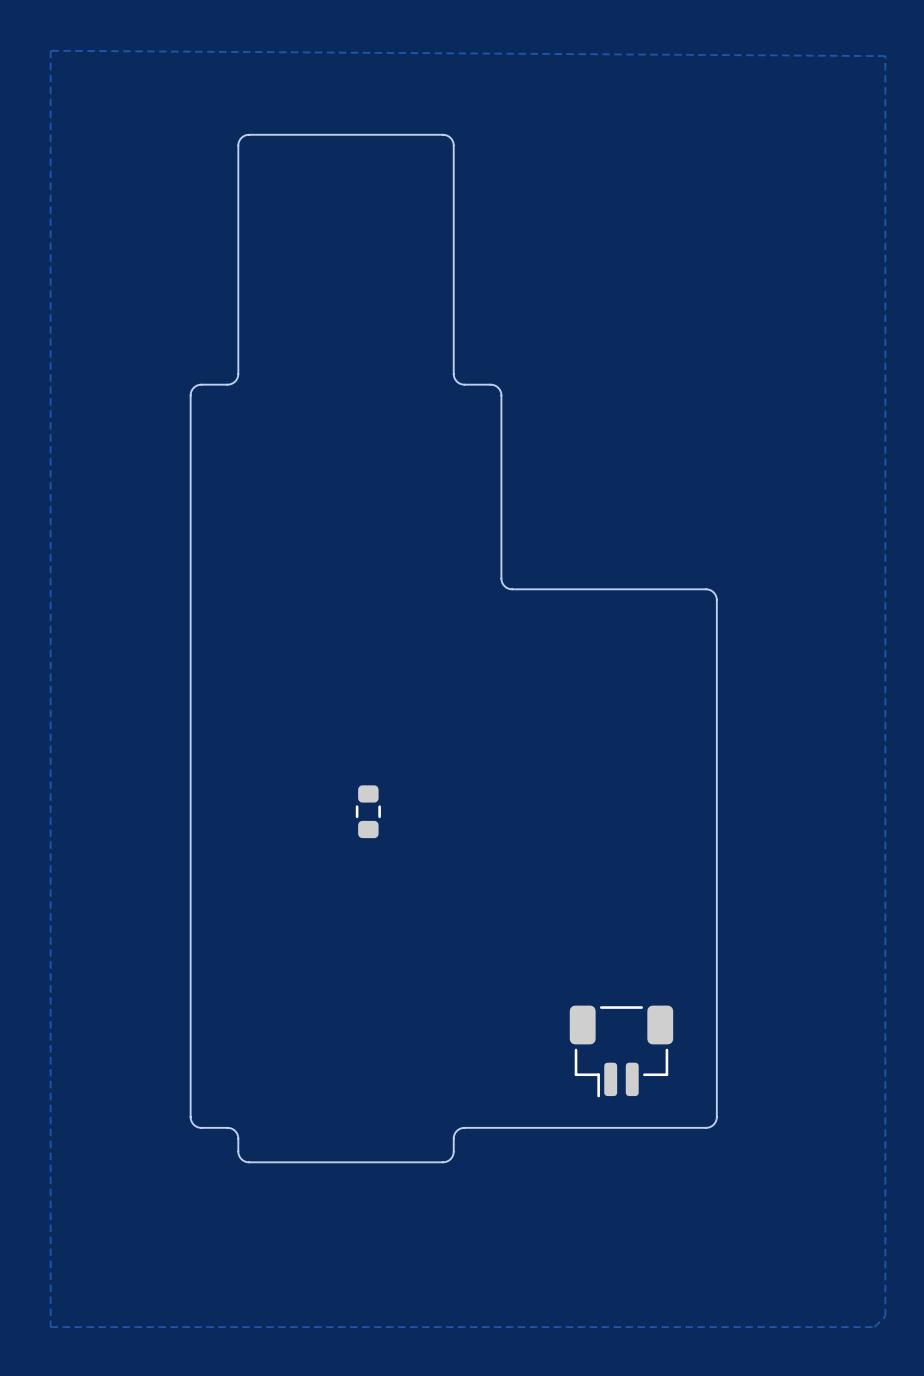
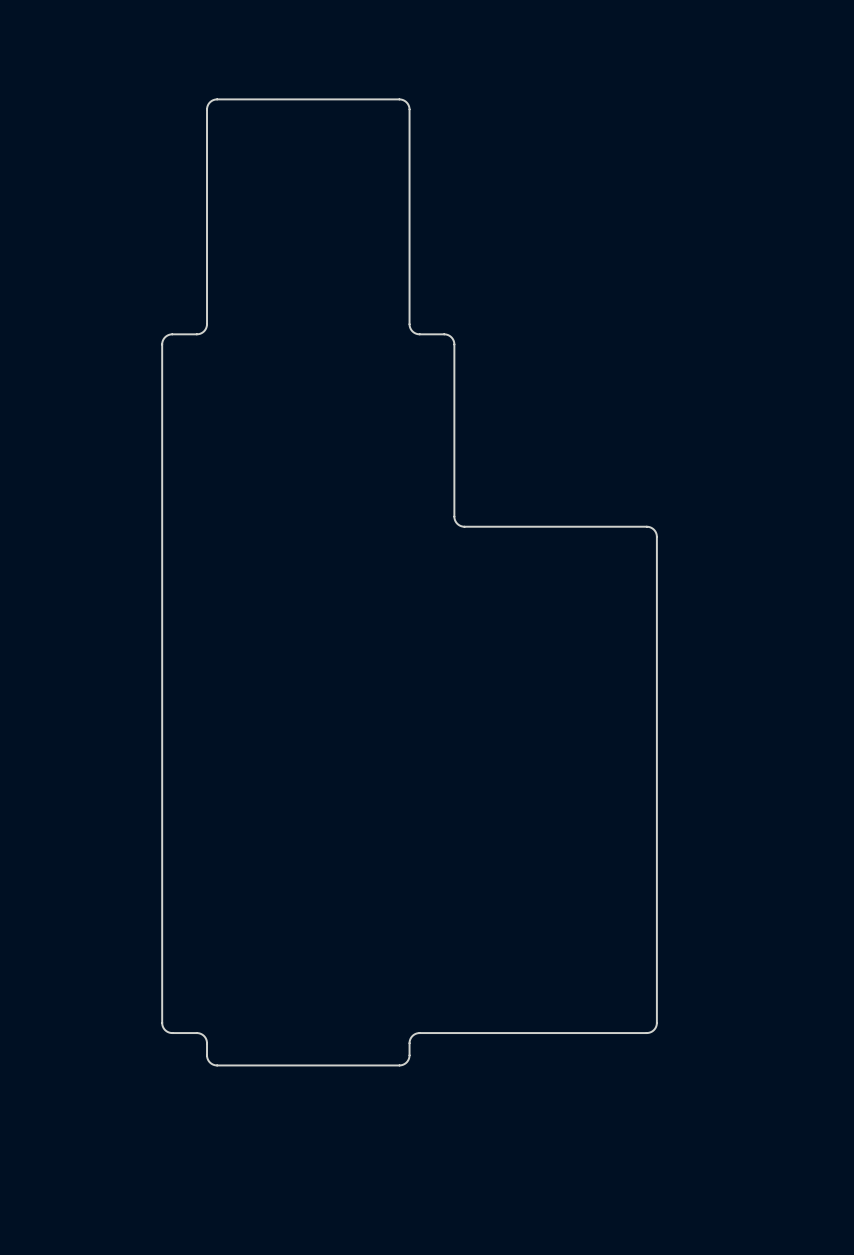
zone outline: (50, 50) (885, 56) (885, 1316) (874, 1327) (50, 1327) (50, 50) -> none
part: (368, 811) -> none
part: (621, 1051) -> none

